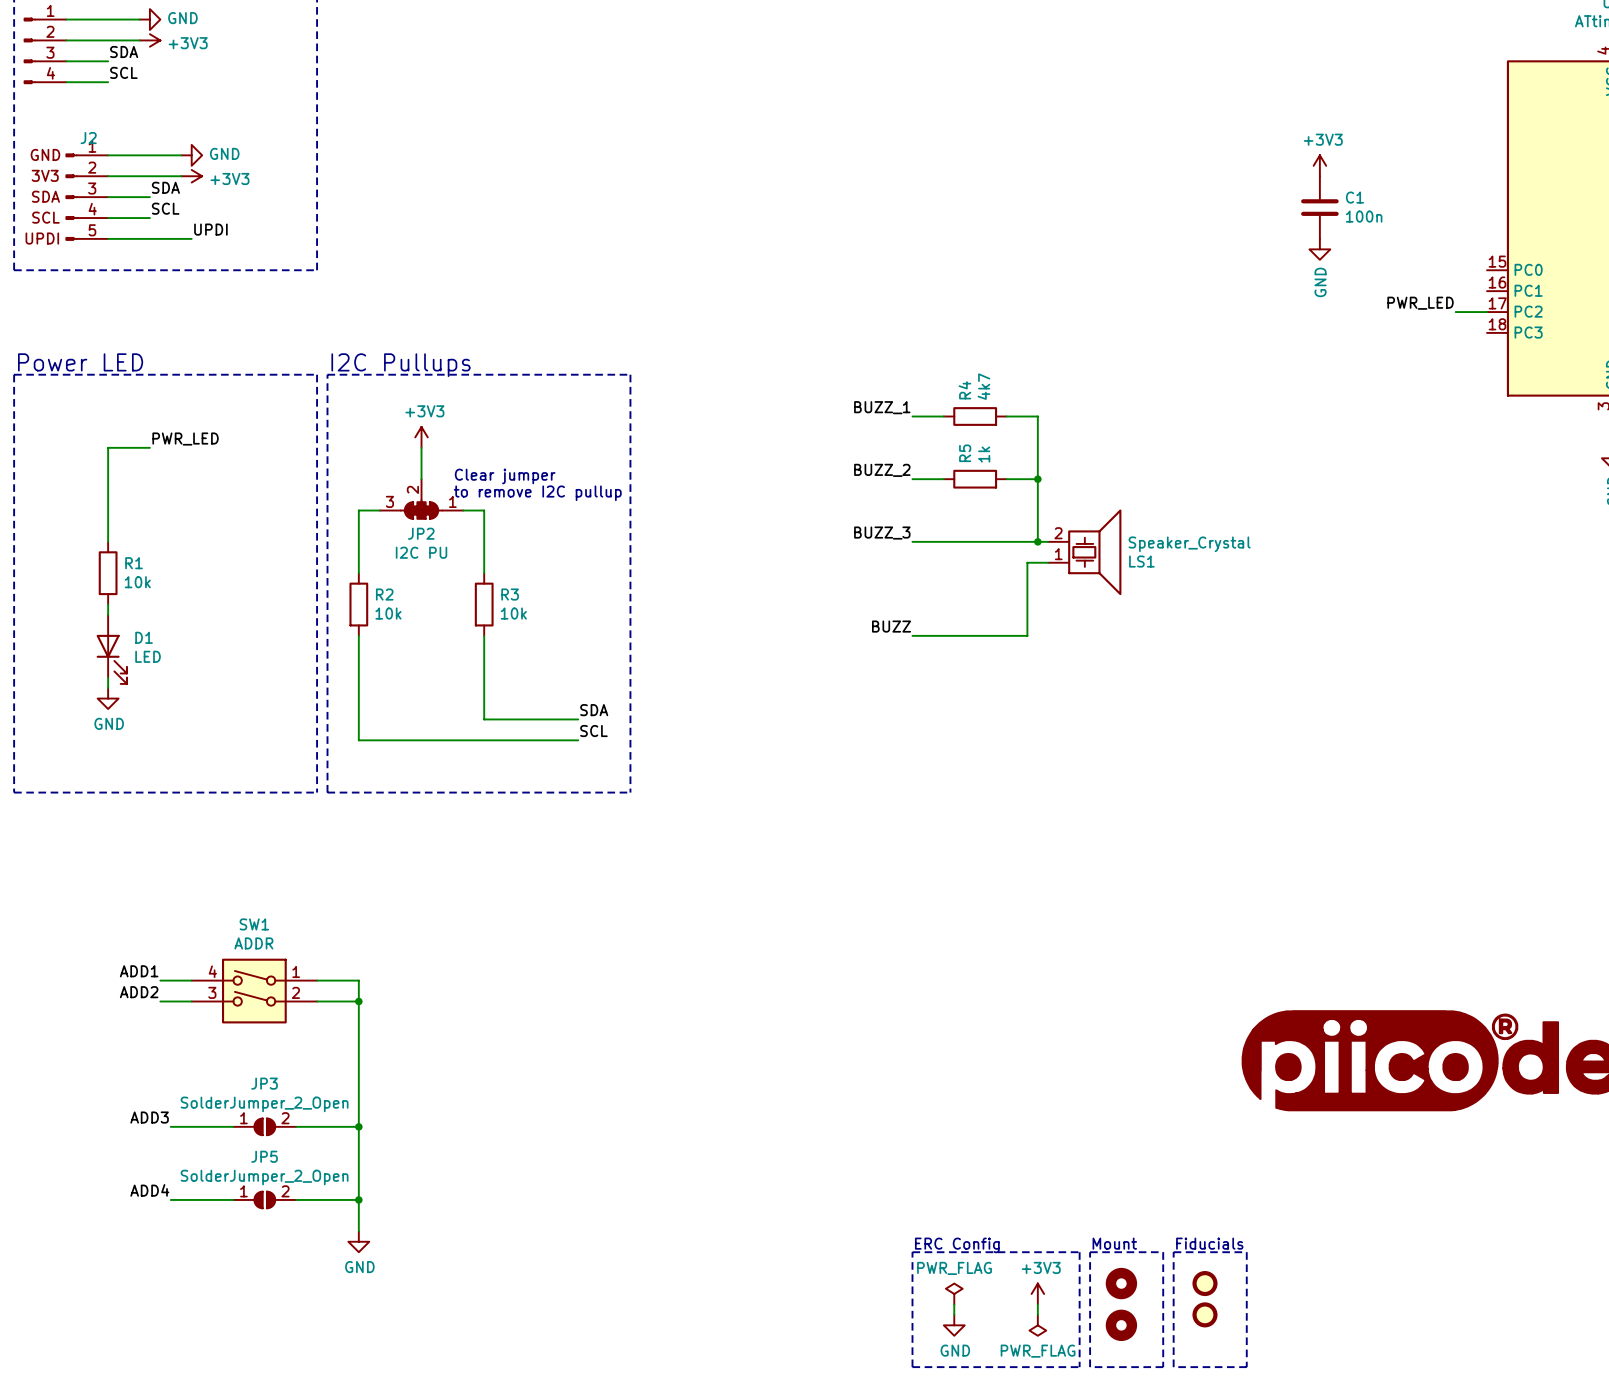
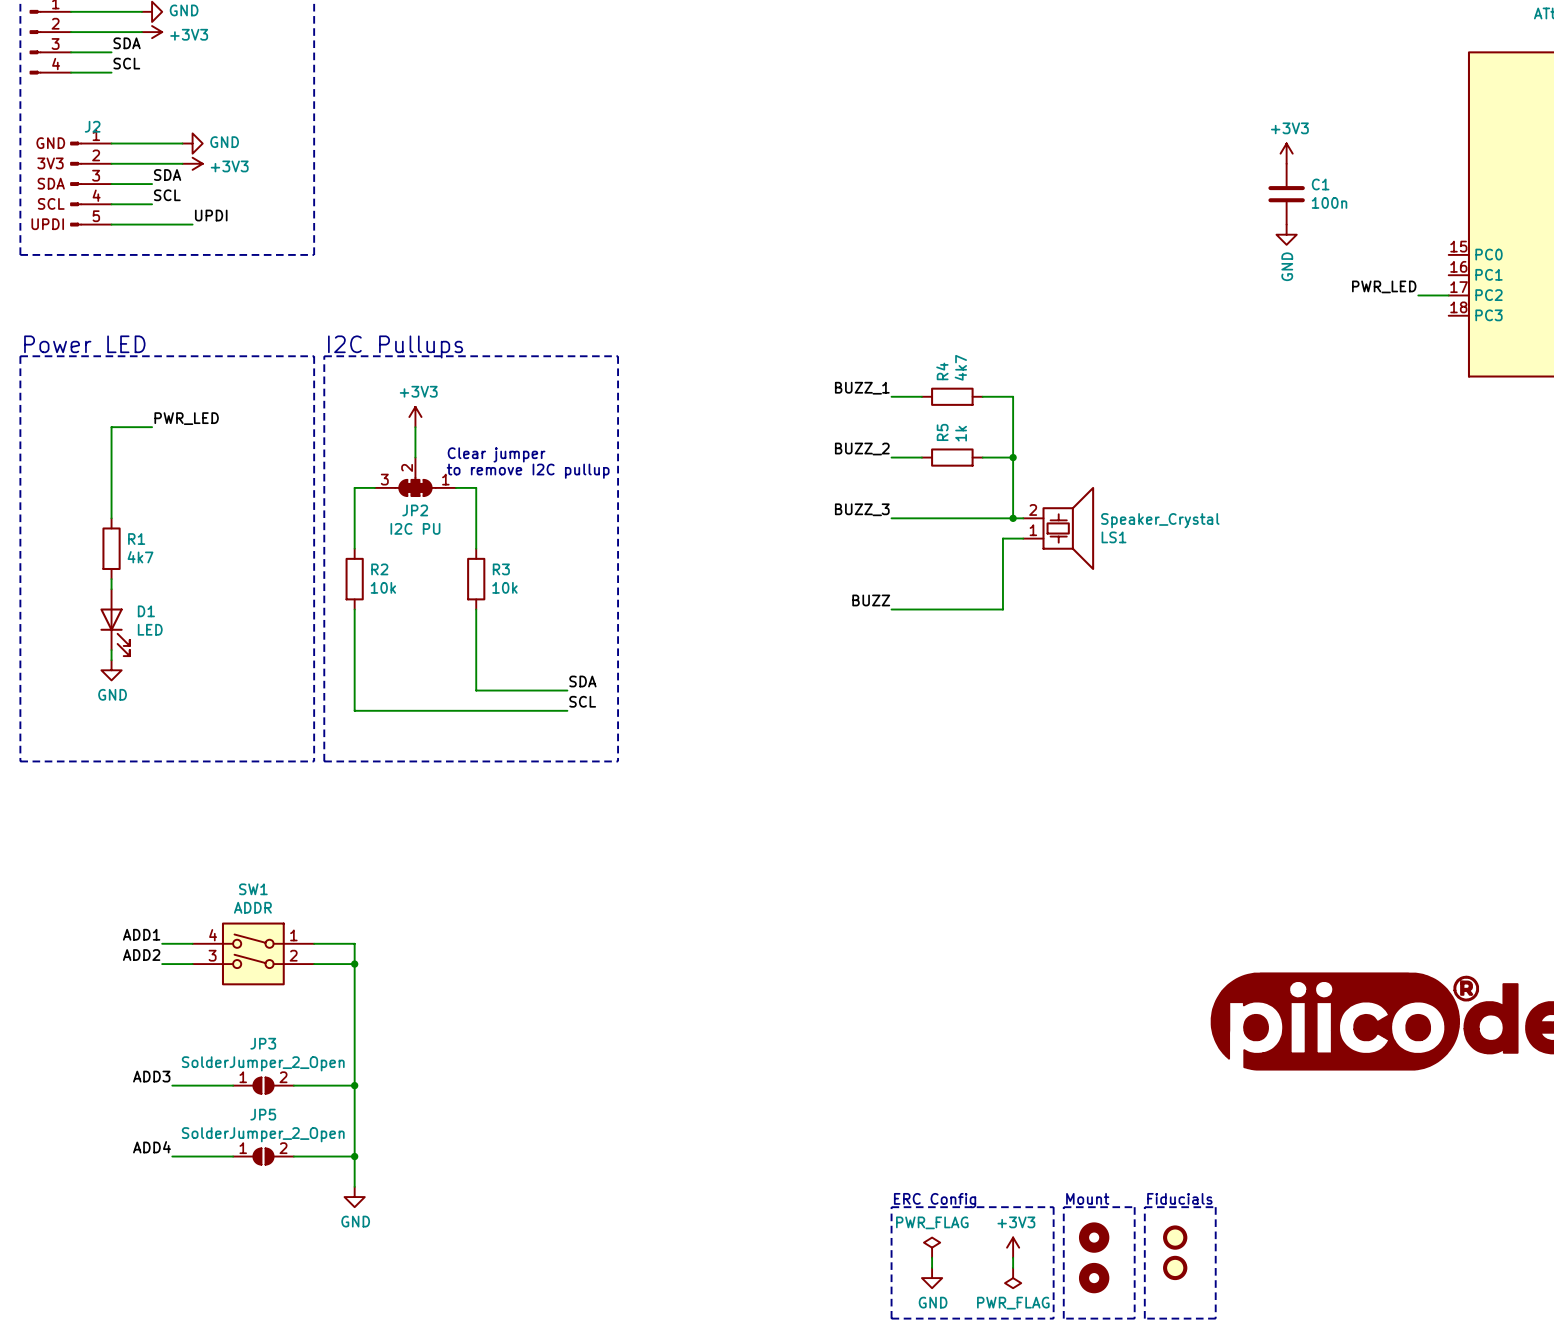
R1 value: 10k (137, 582) -> 4k7 (140, 557)

